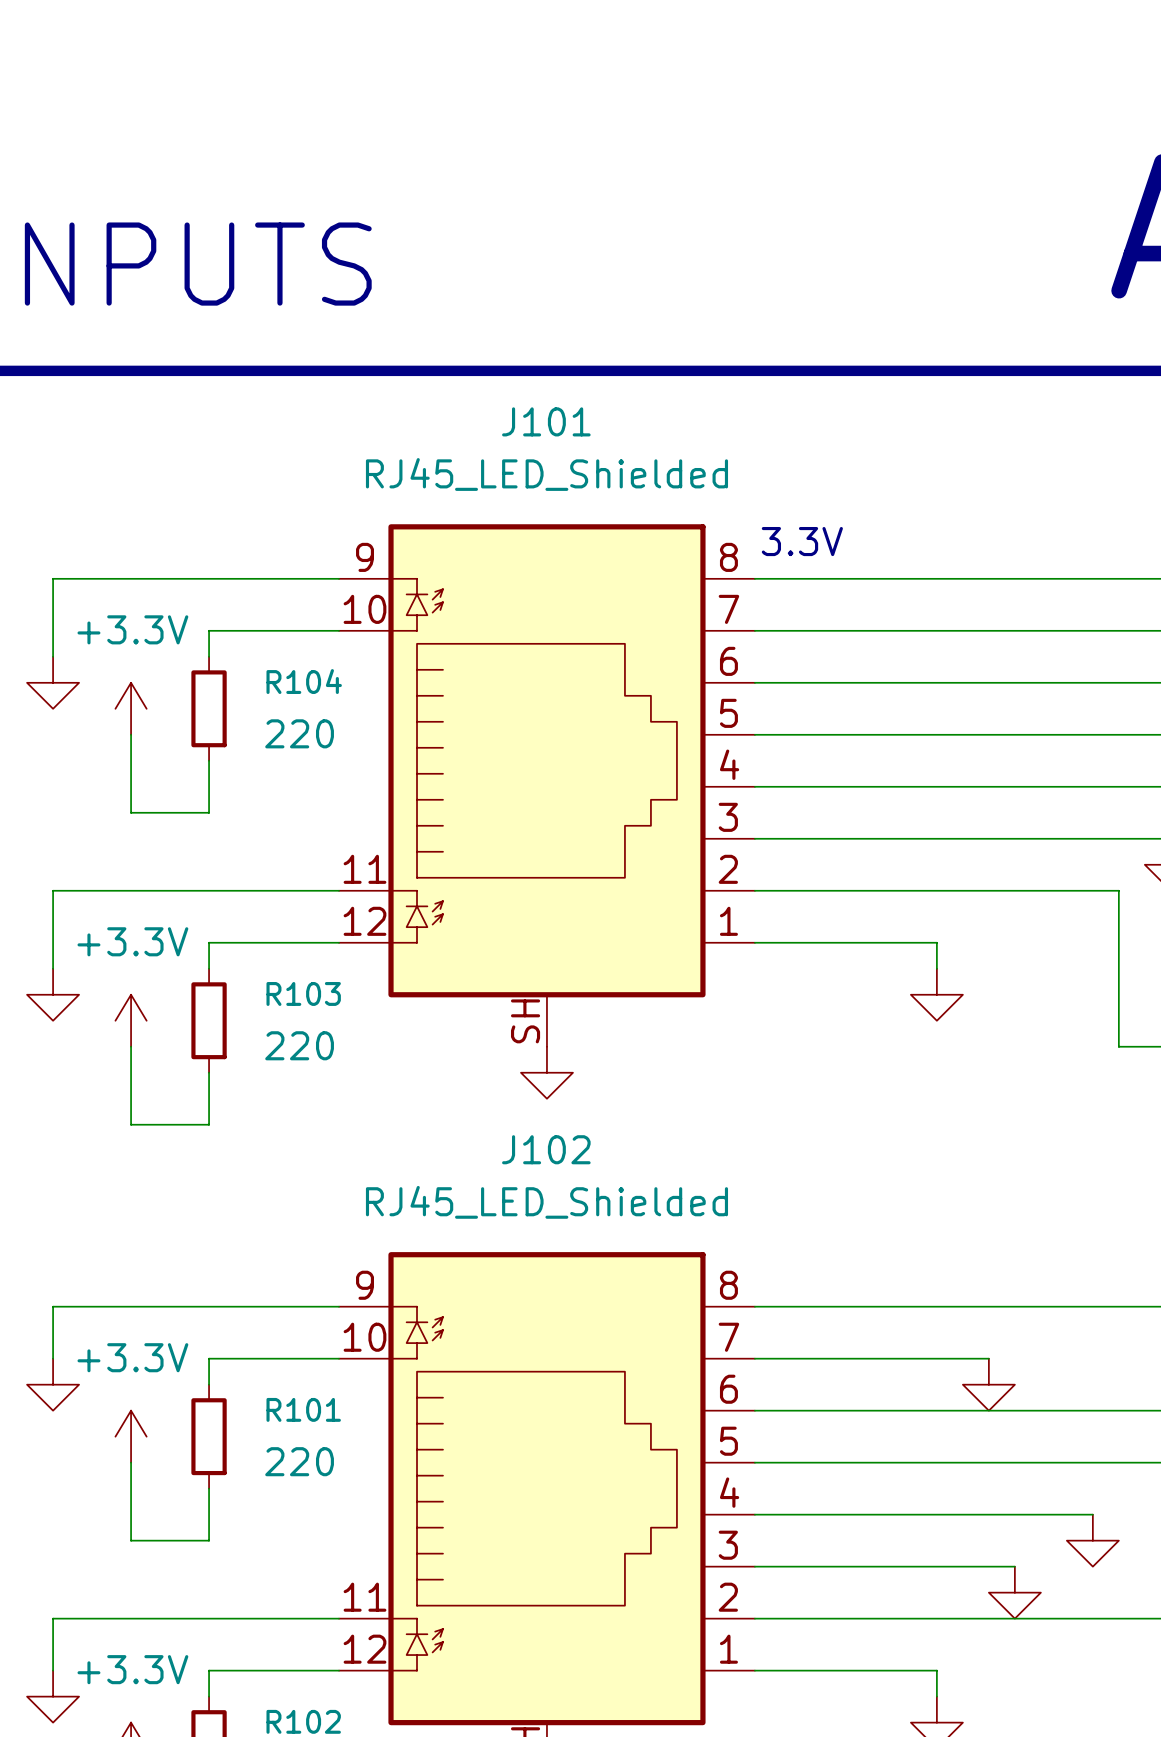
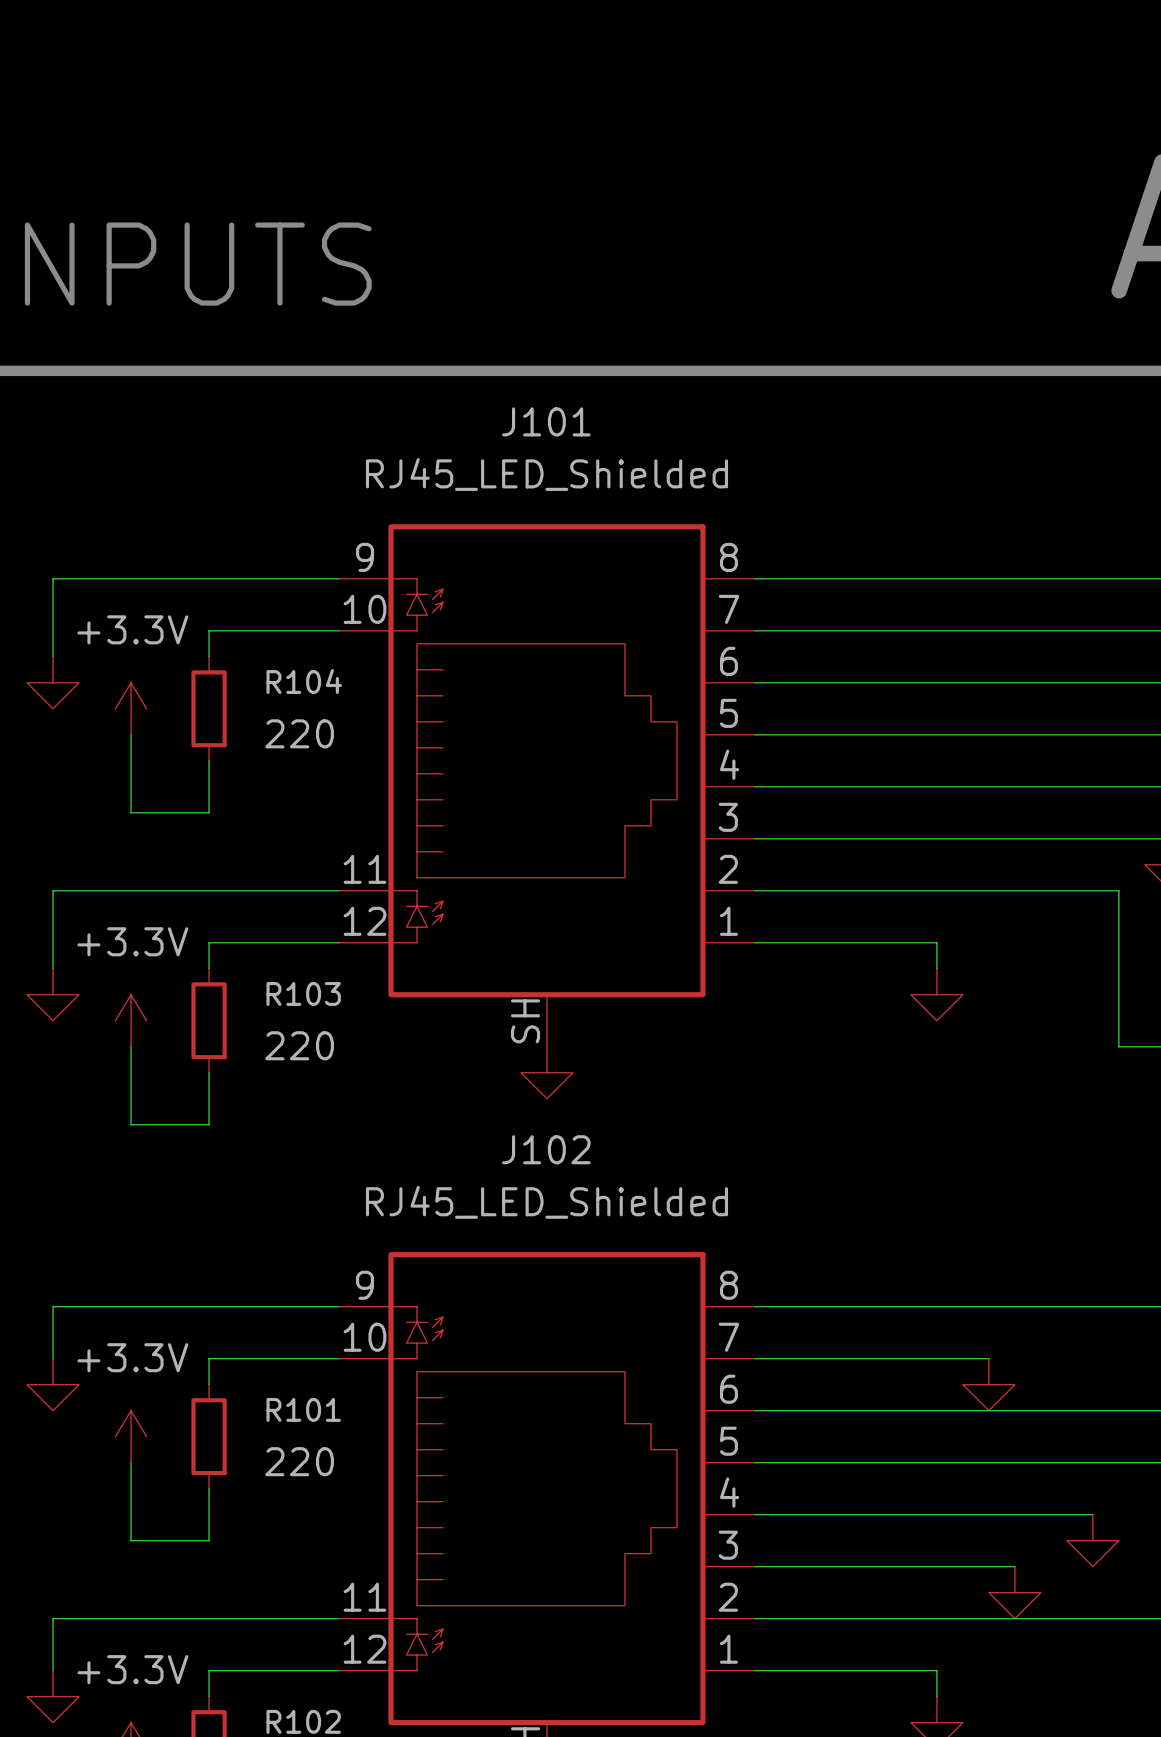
text: 3.3V (802, 541) -> none

